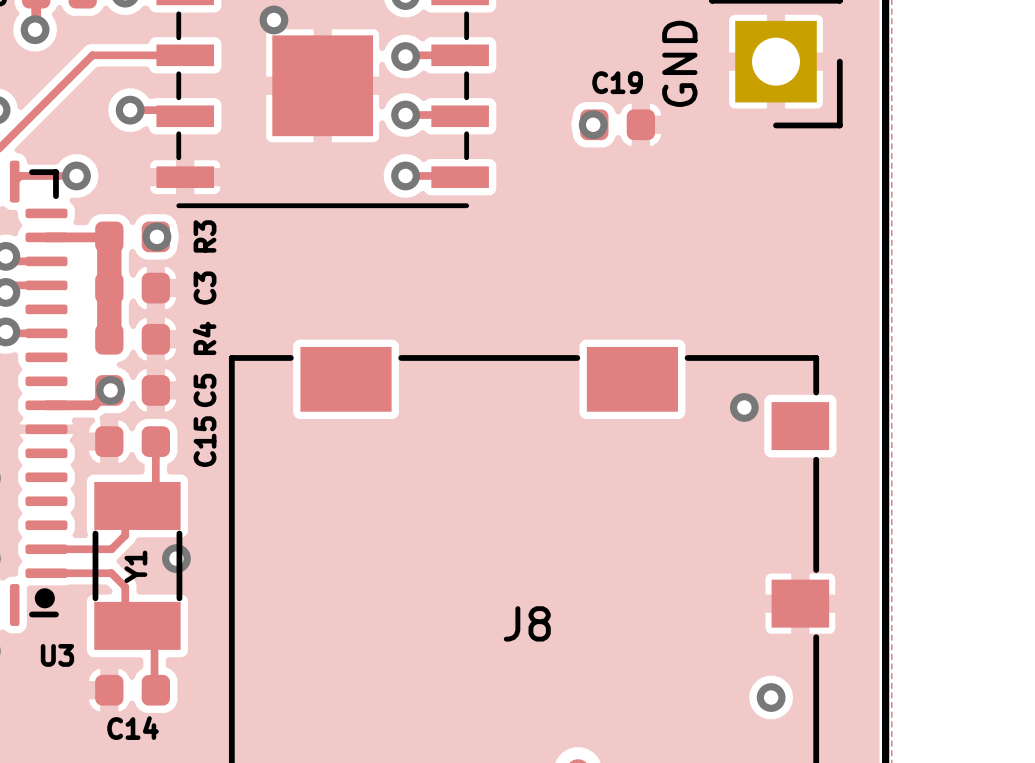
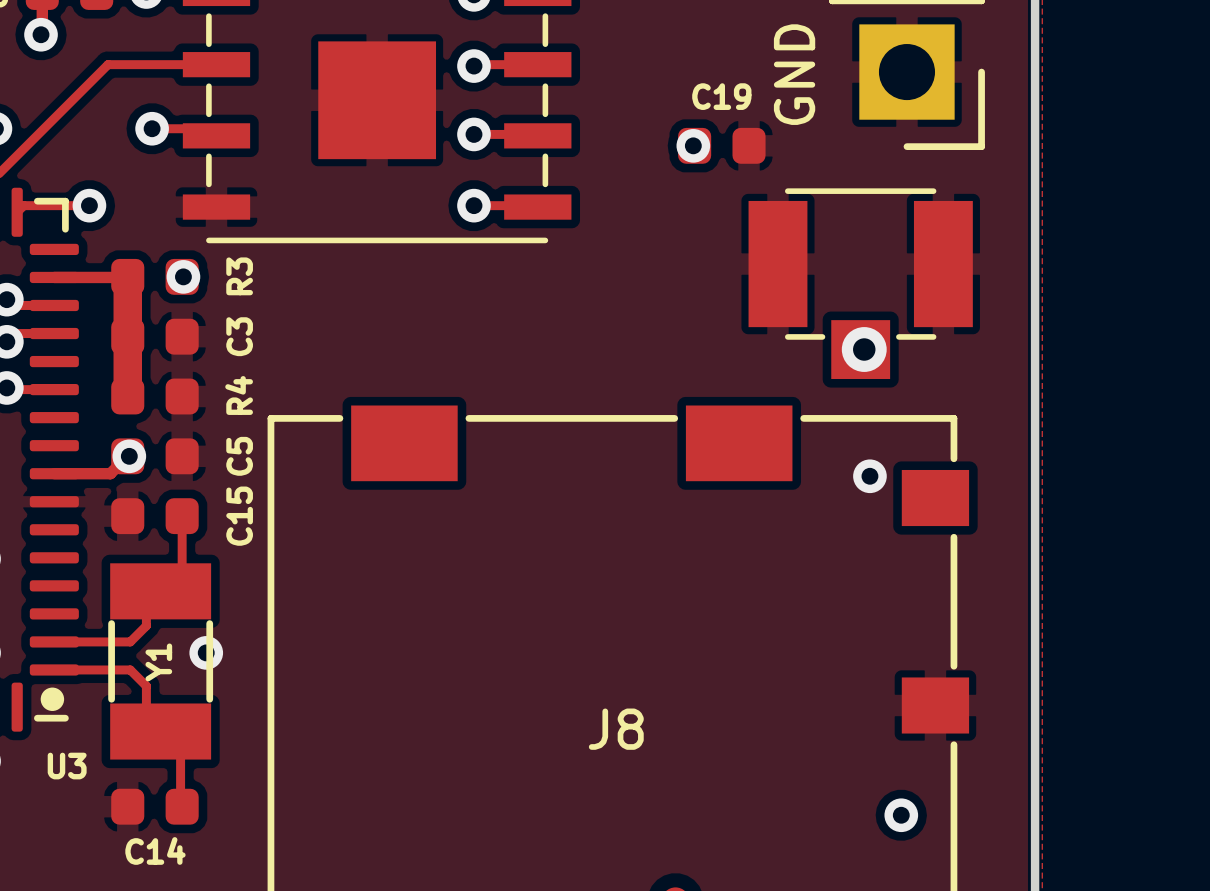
via: (273, 19) -> none
part: none -> (860, 283)
via: none -> (864, 349)

